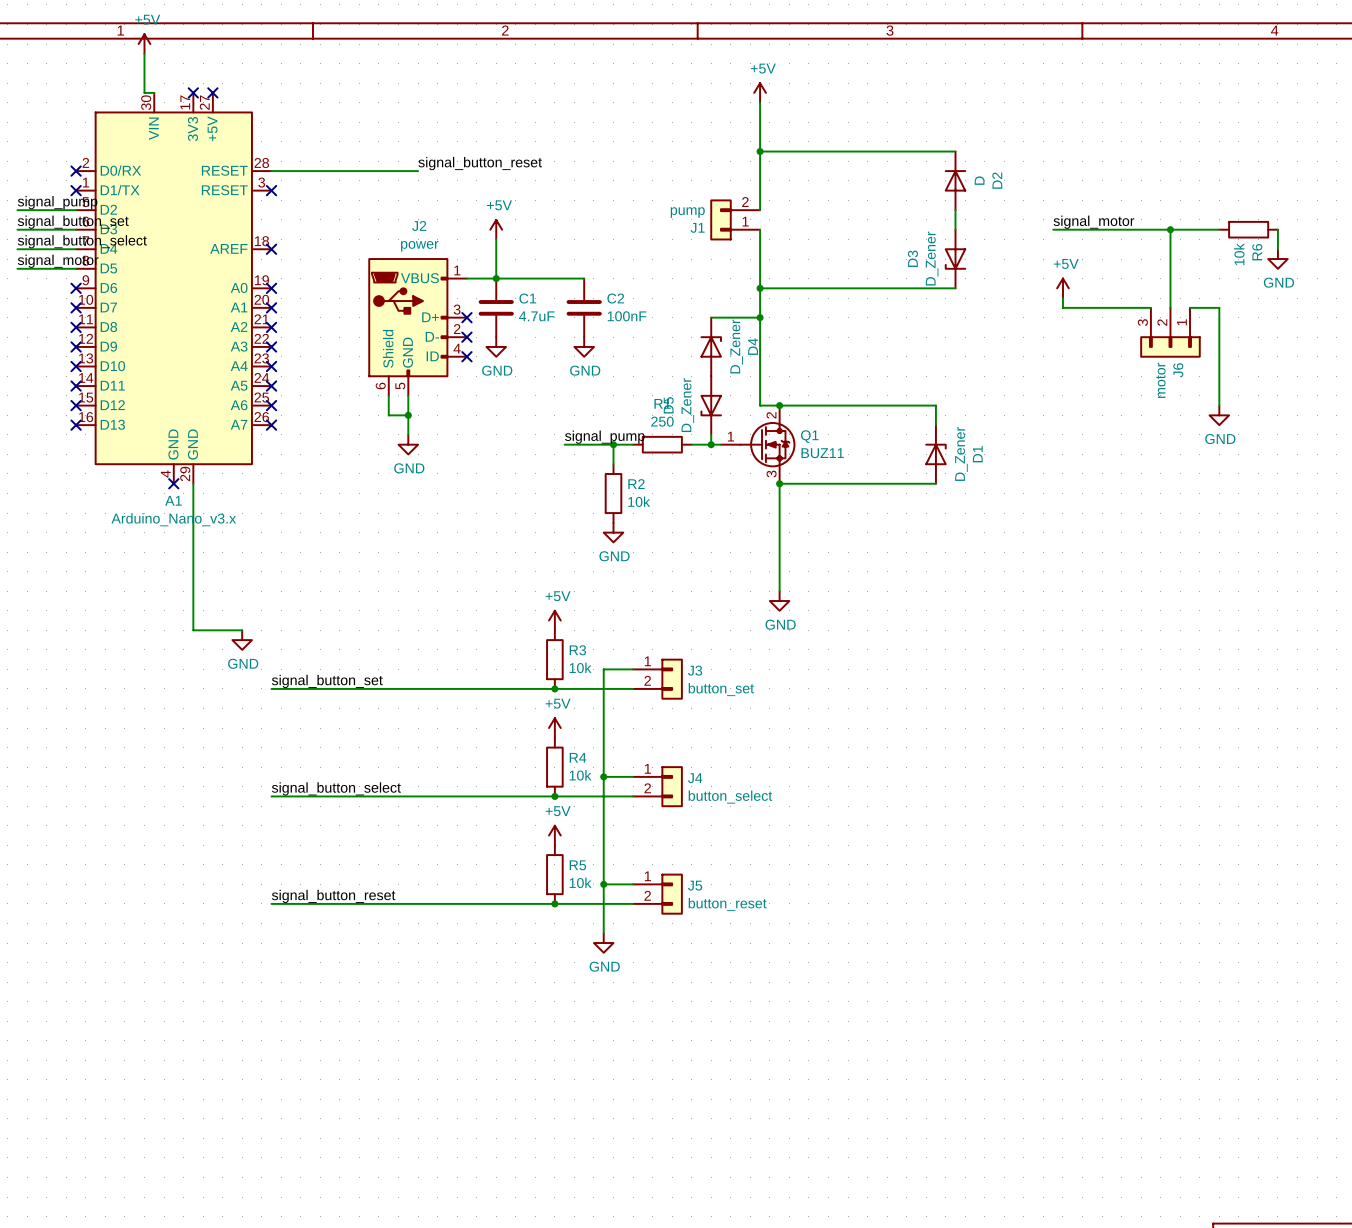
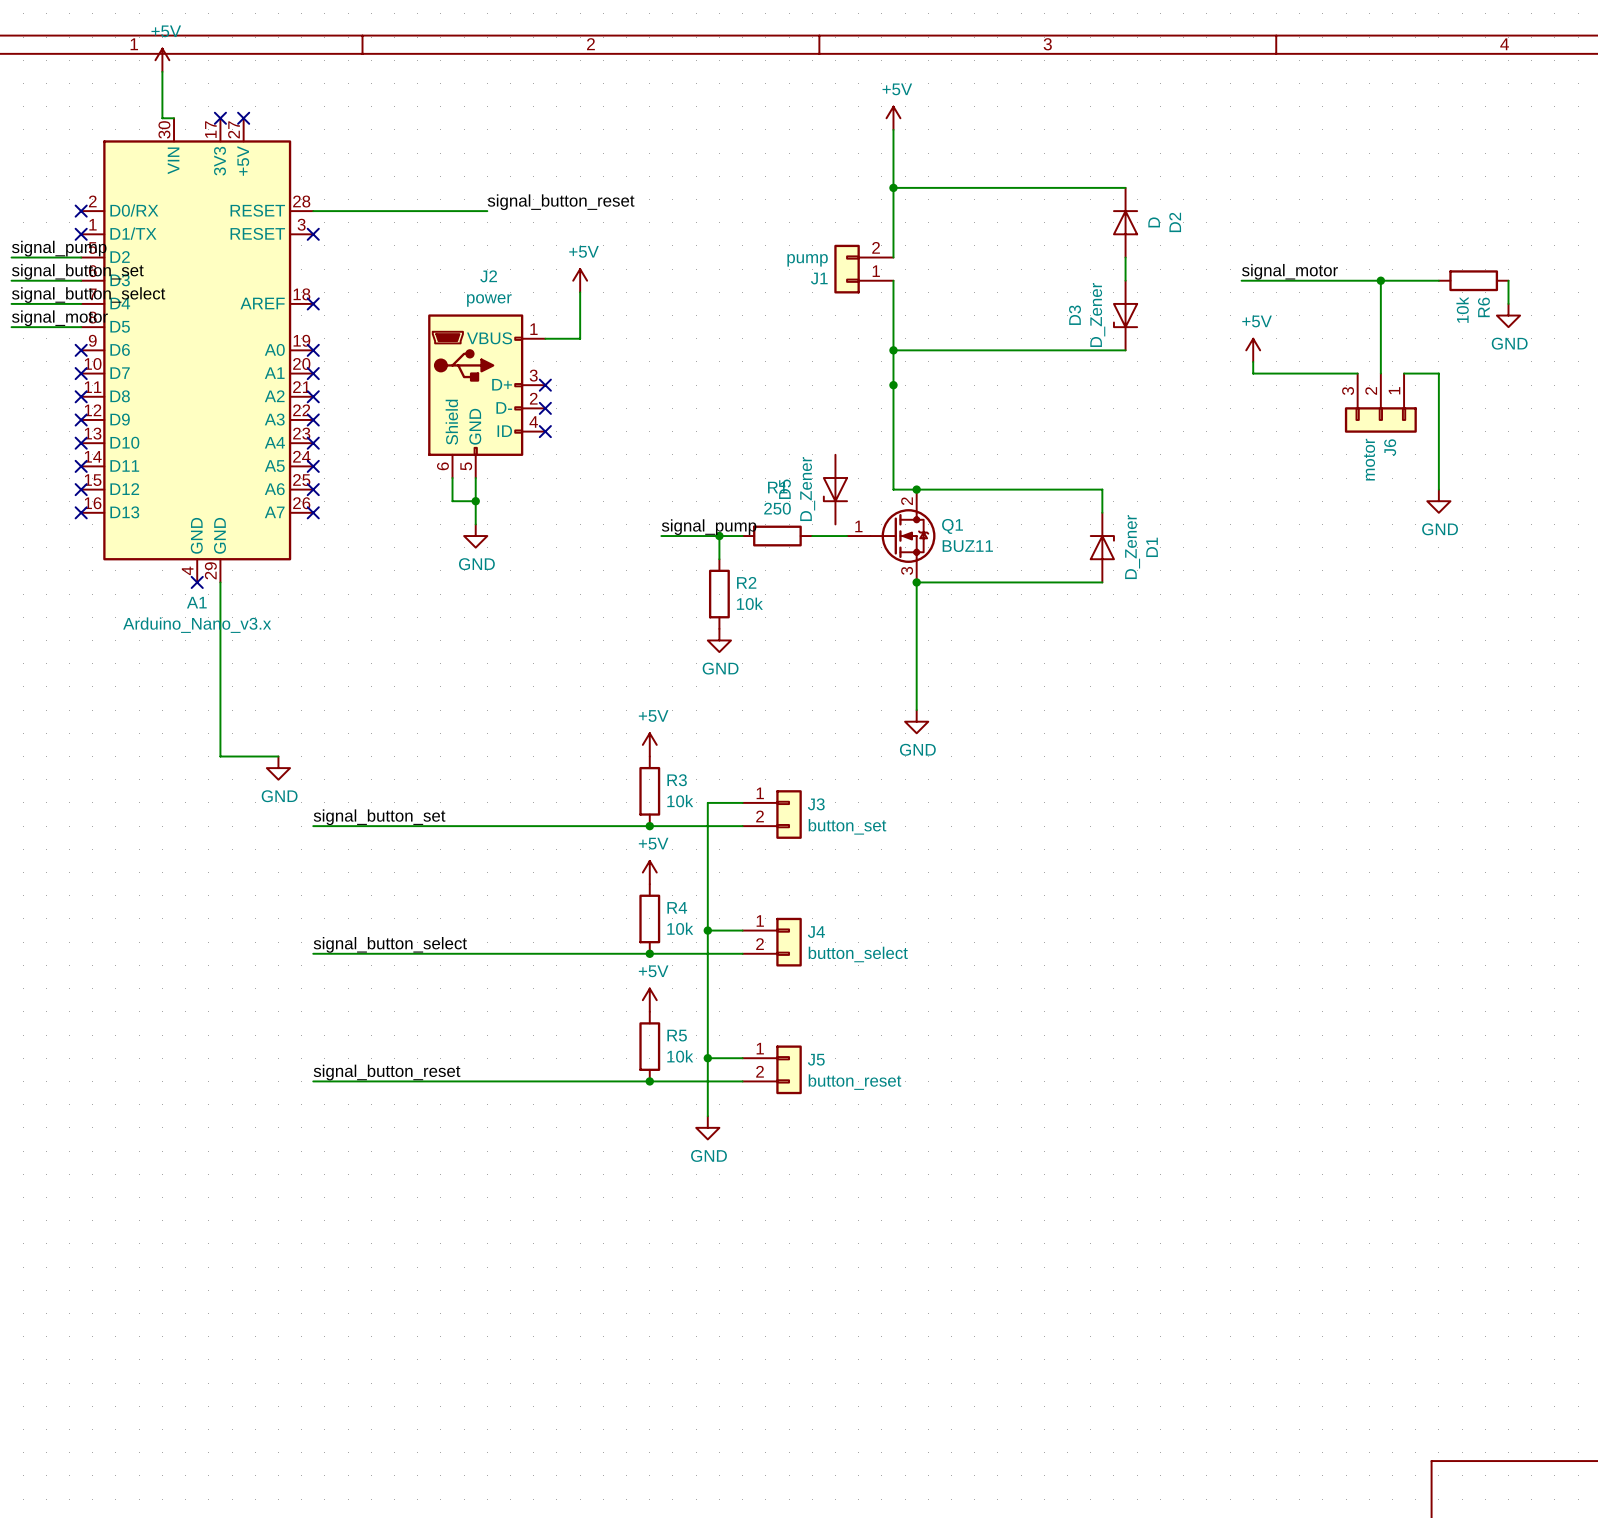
wire: (496, 278) (584, 278) -> none
junction: (496, 278) -> none
C1: 4.7uF (496, 307) -> none
C2: 100nF (584, 307) -> none
wire: (711, 317) (760, 317) -> none
power symbol: GND (496, 346) -> none
power symbol: GND (584, 346) -> none
D4: D_Zener (711, 346) -> none
wire: (711, 434) (711, 444) -> none
junction: (711, 444) -> none

